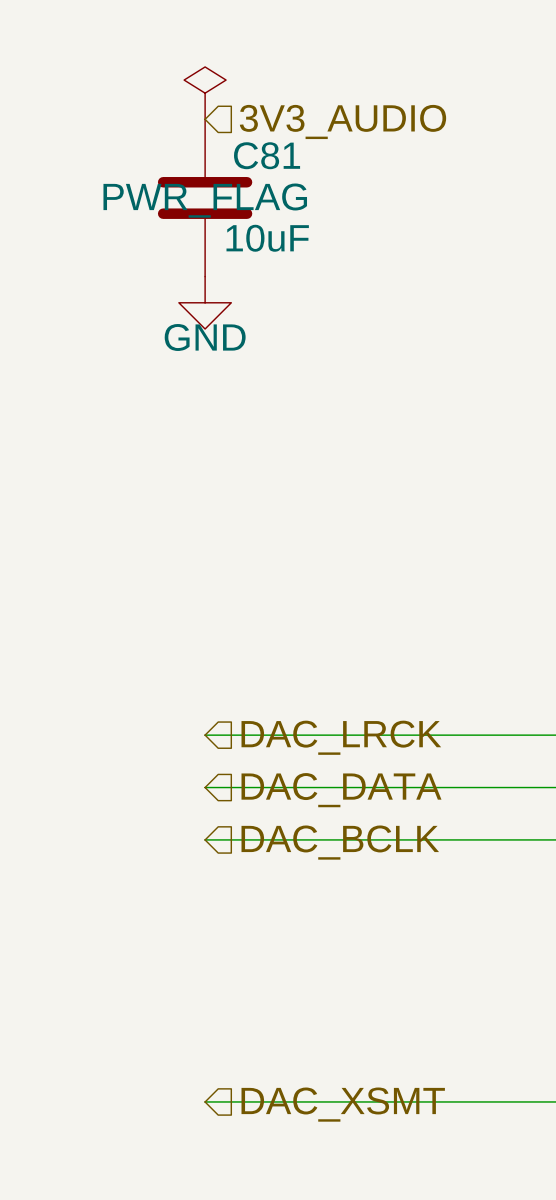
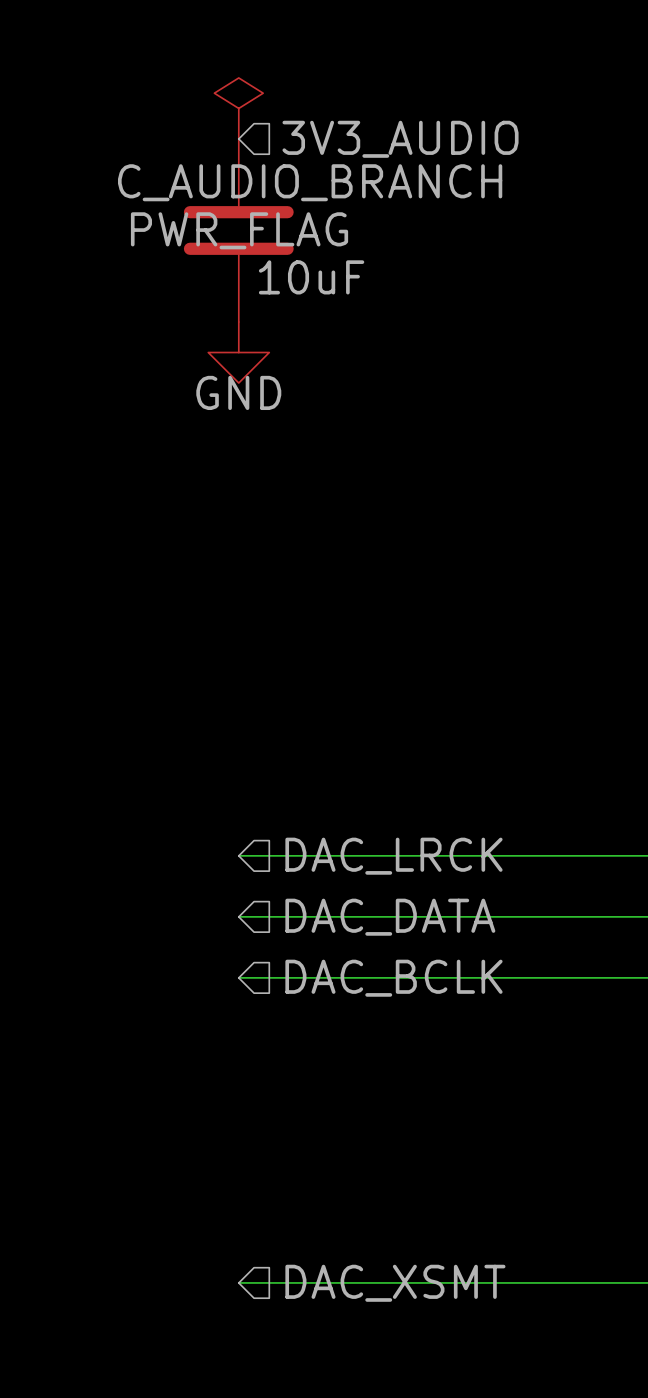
C81 name: C81 (267, 155) -> C_AUDIO_BRANCH (310, 182)

